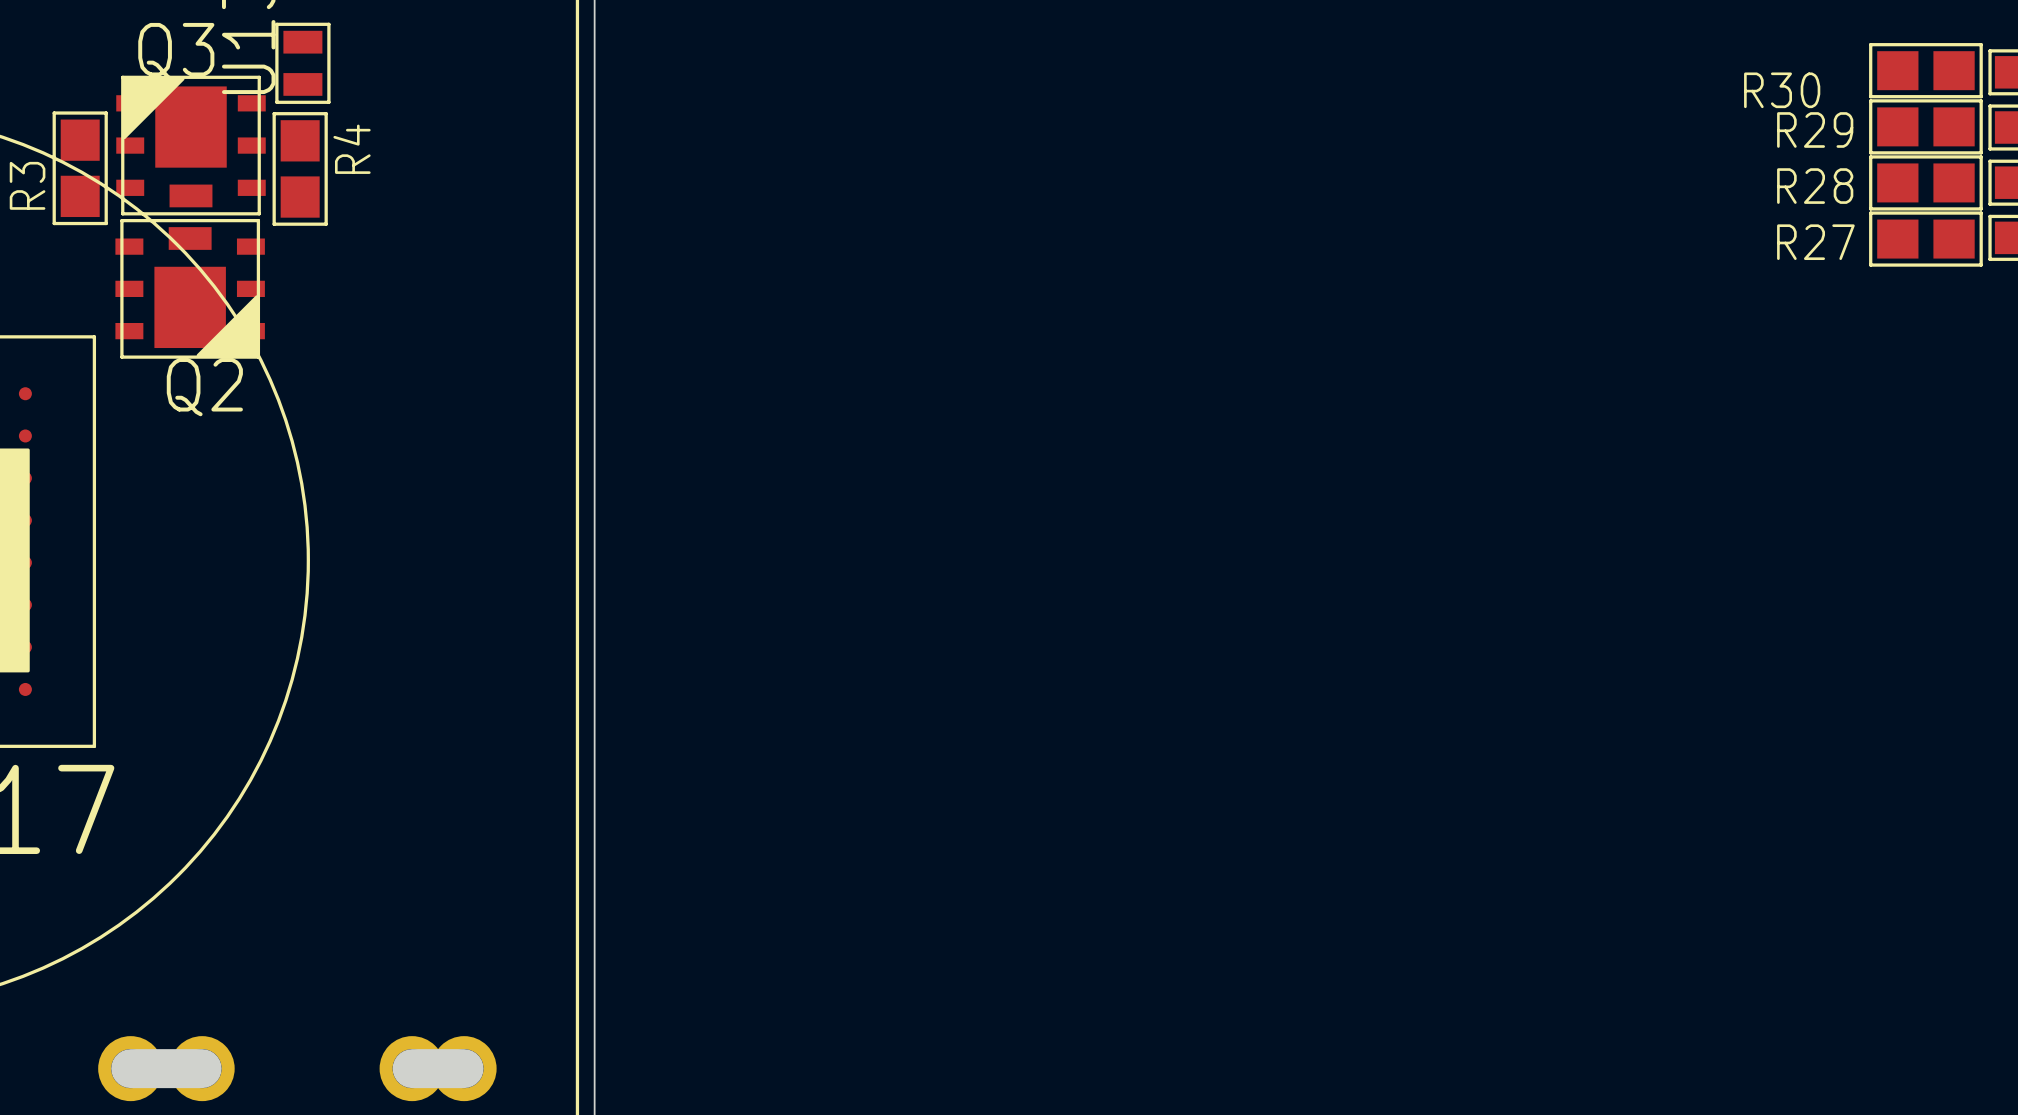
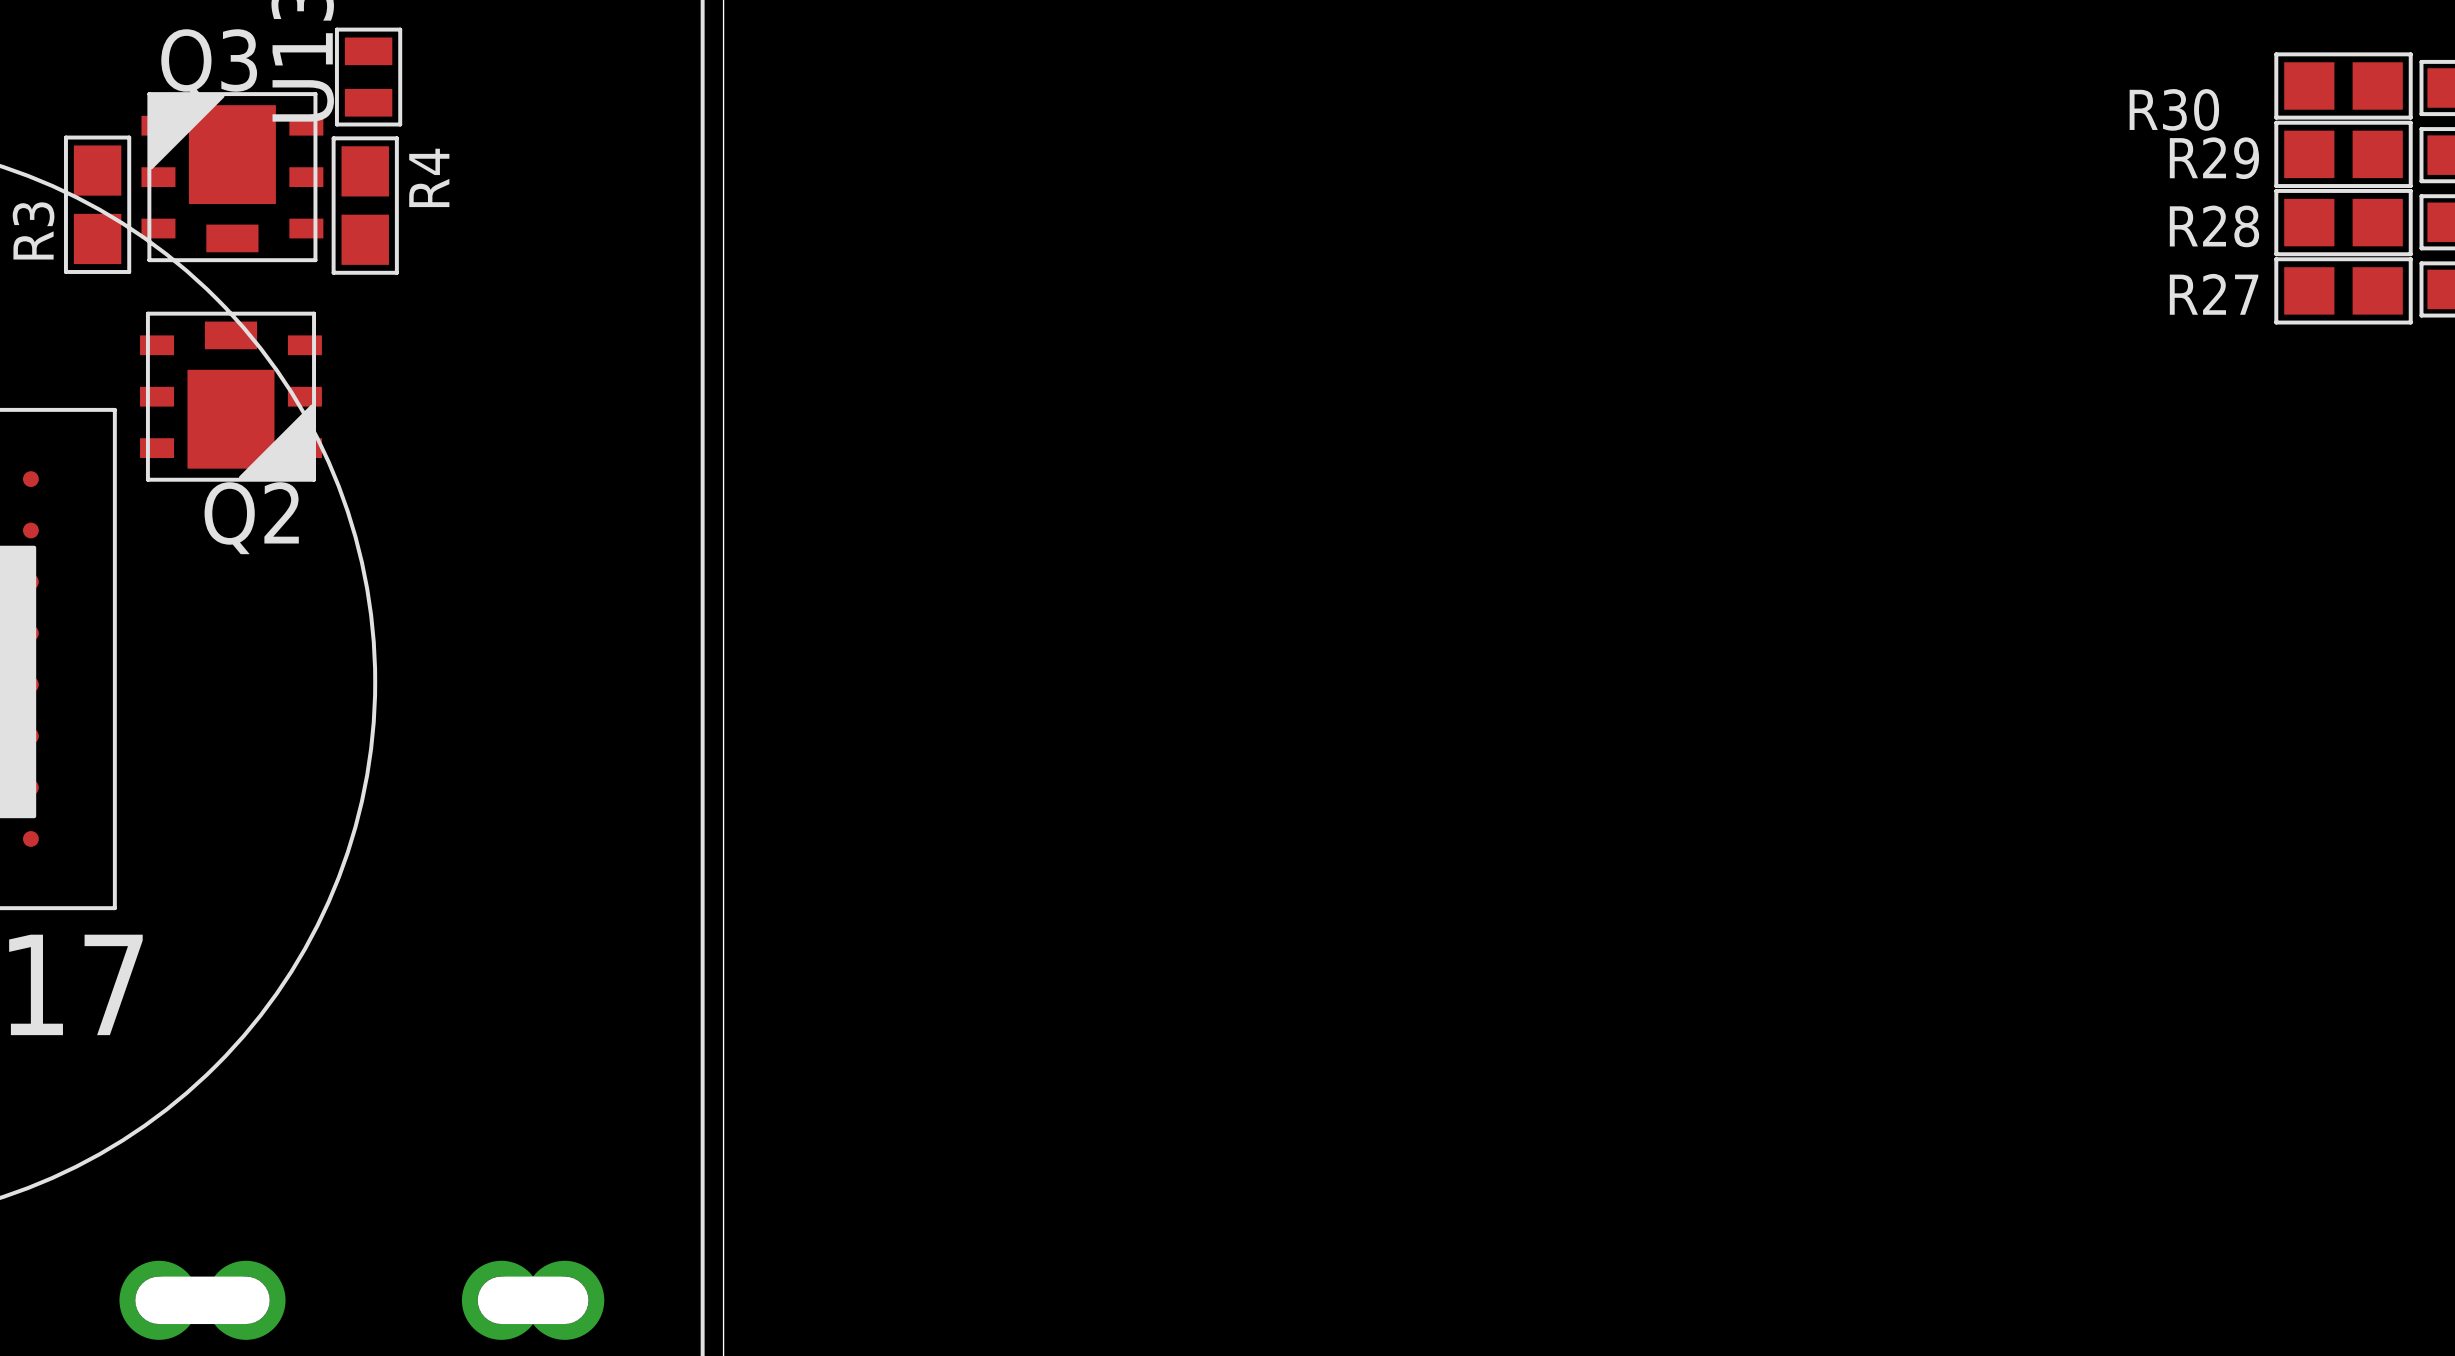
Q2 position: (190, 288) -> (230, 396)

